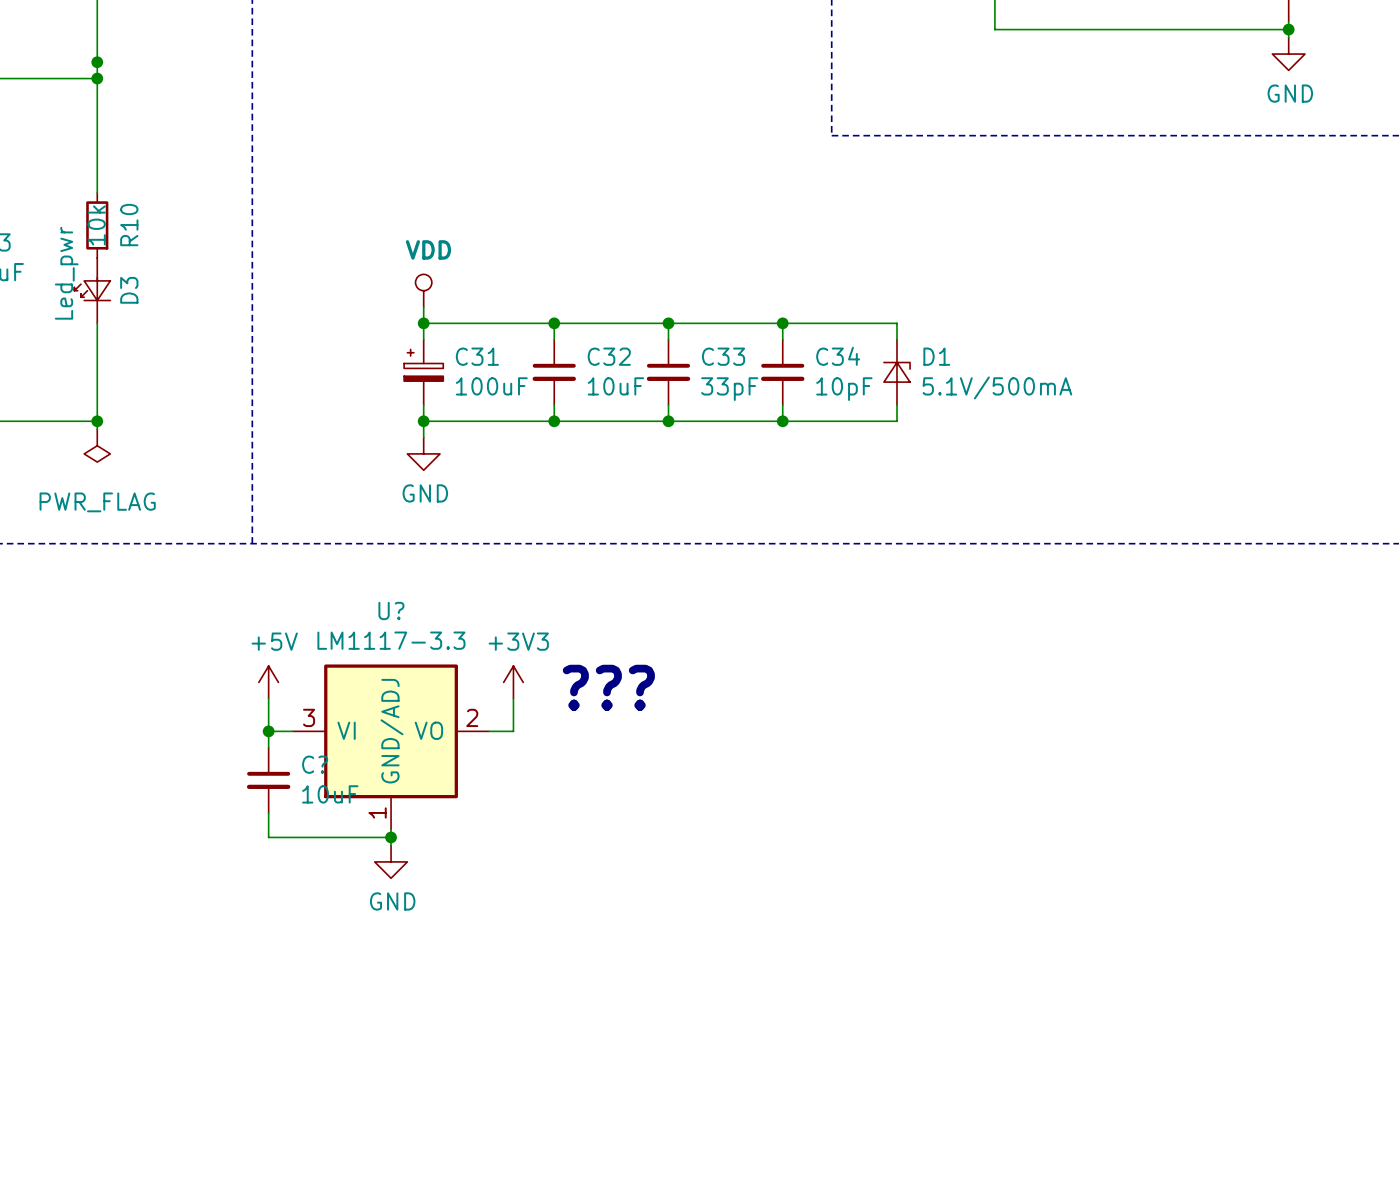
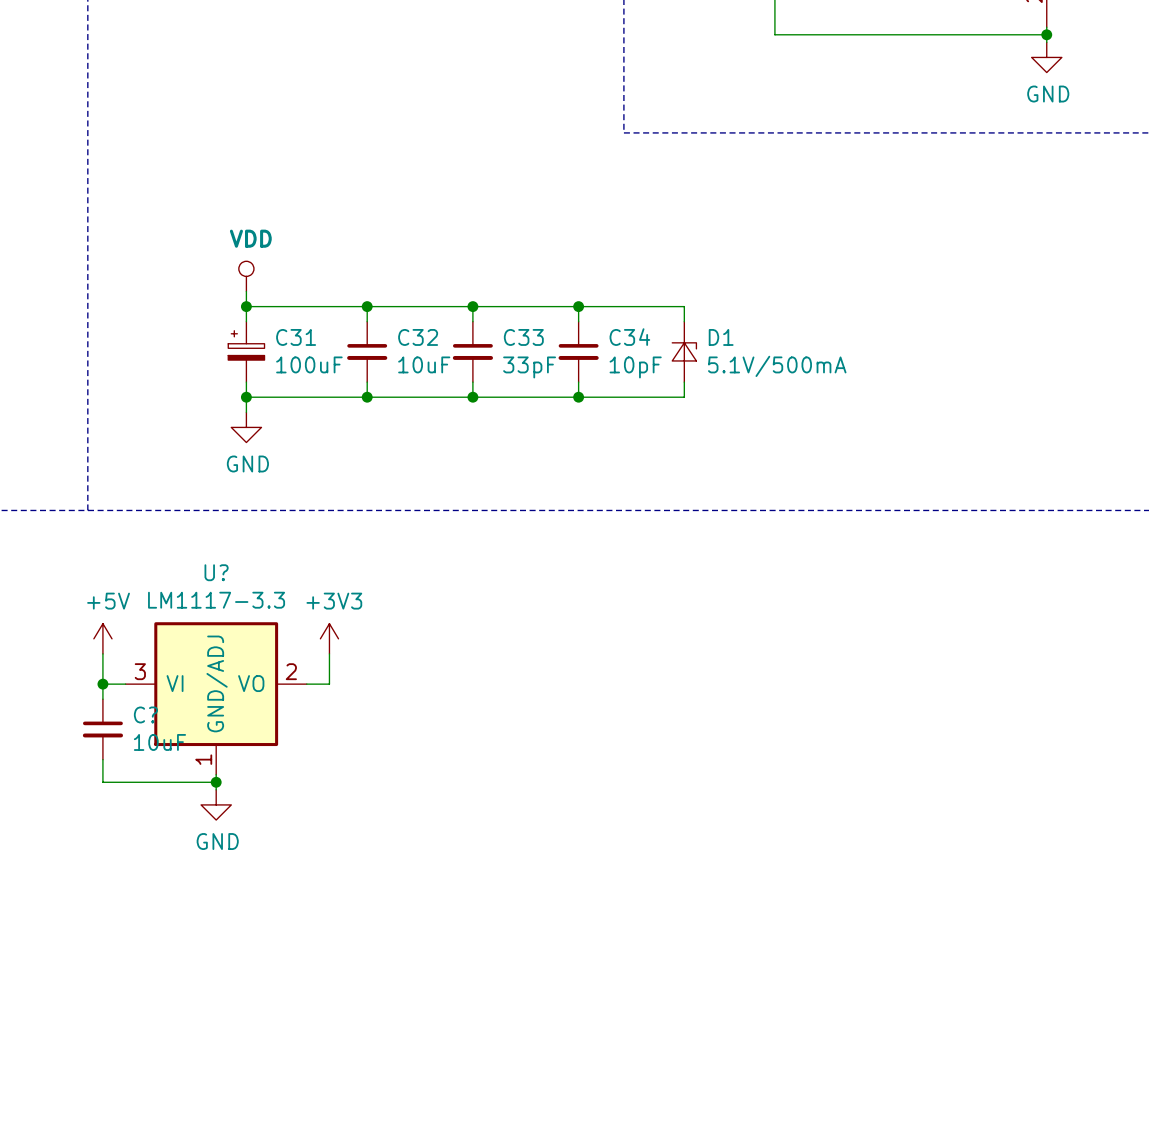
text: ??? (608, 687) -> none

